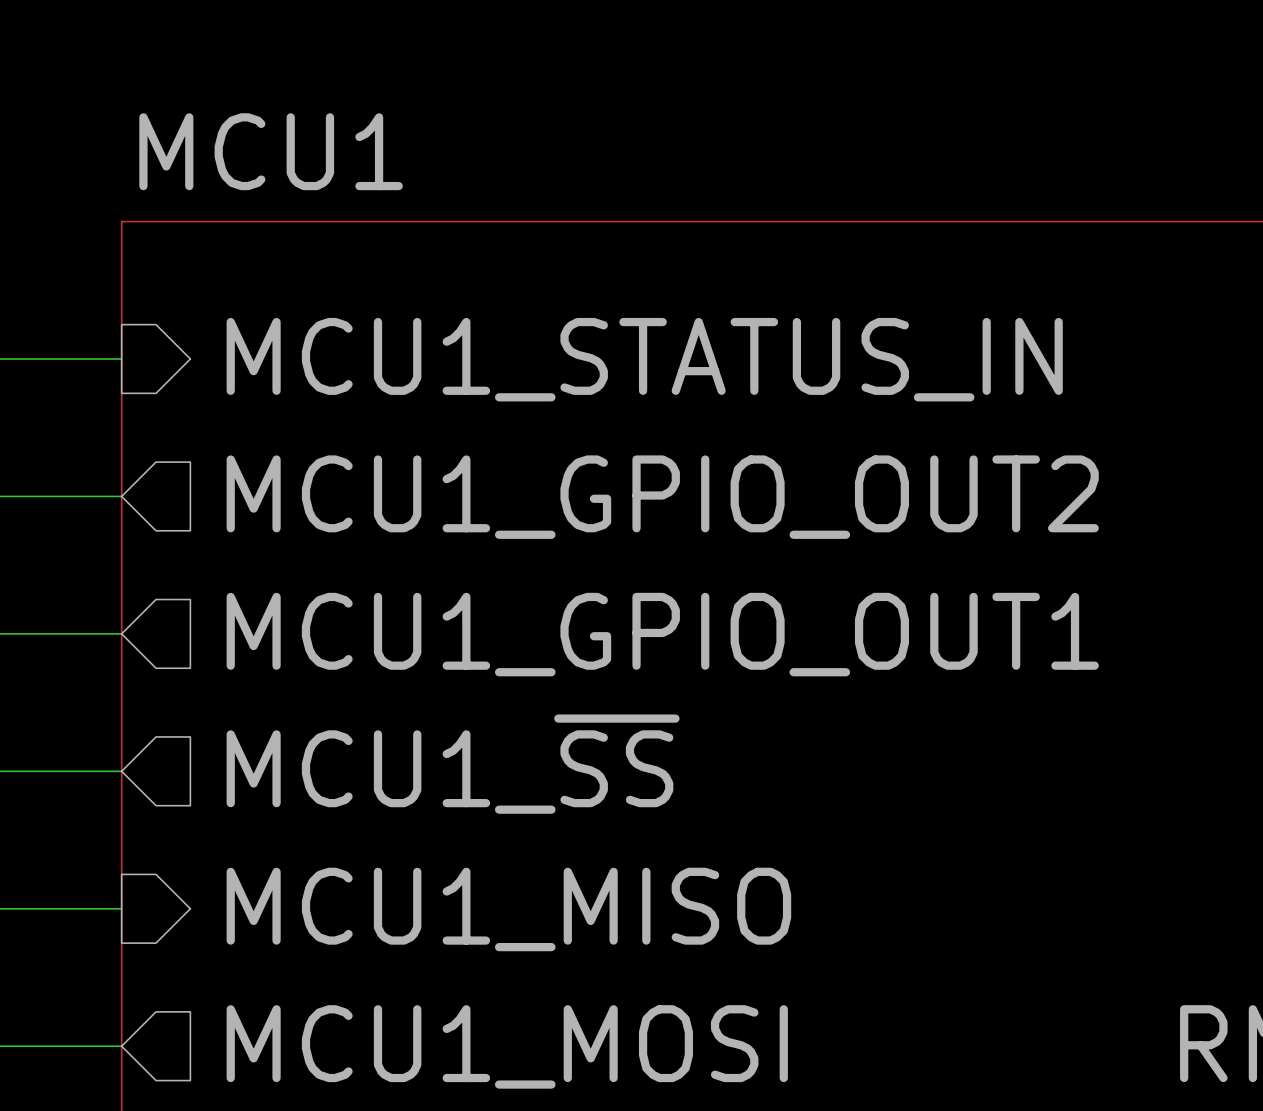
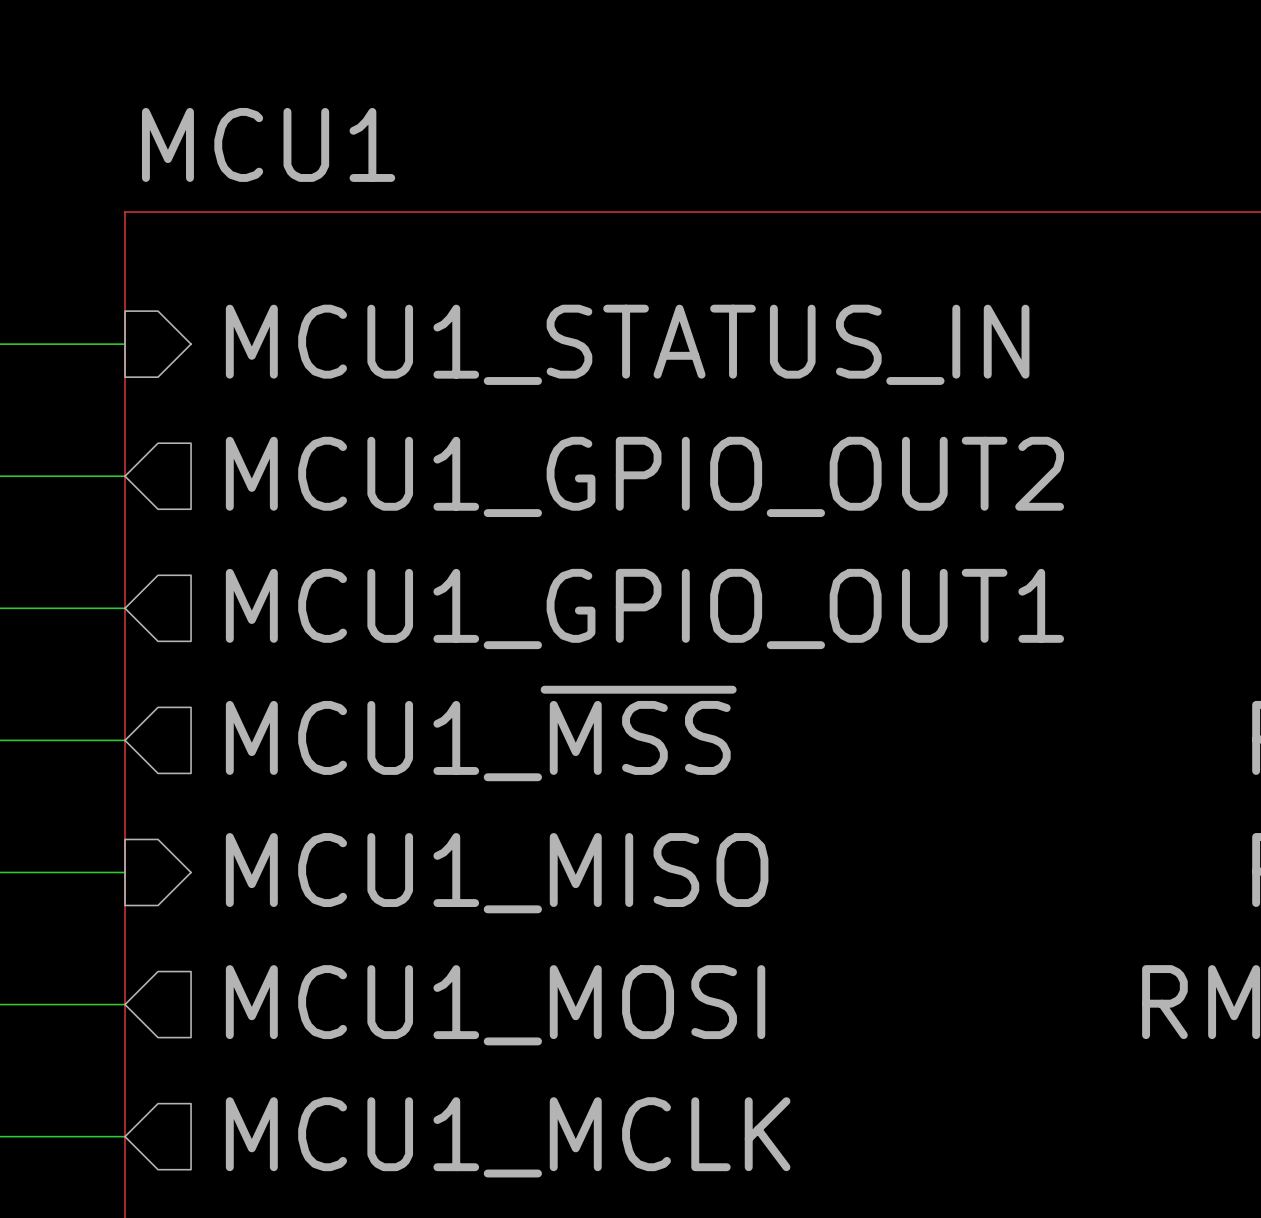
sheet pin: MCU1_~{SS} (453, 764) -> MCU1_~{MSS} (481, 733)

